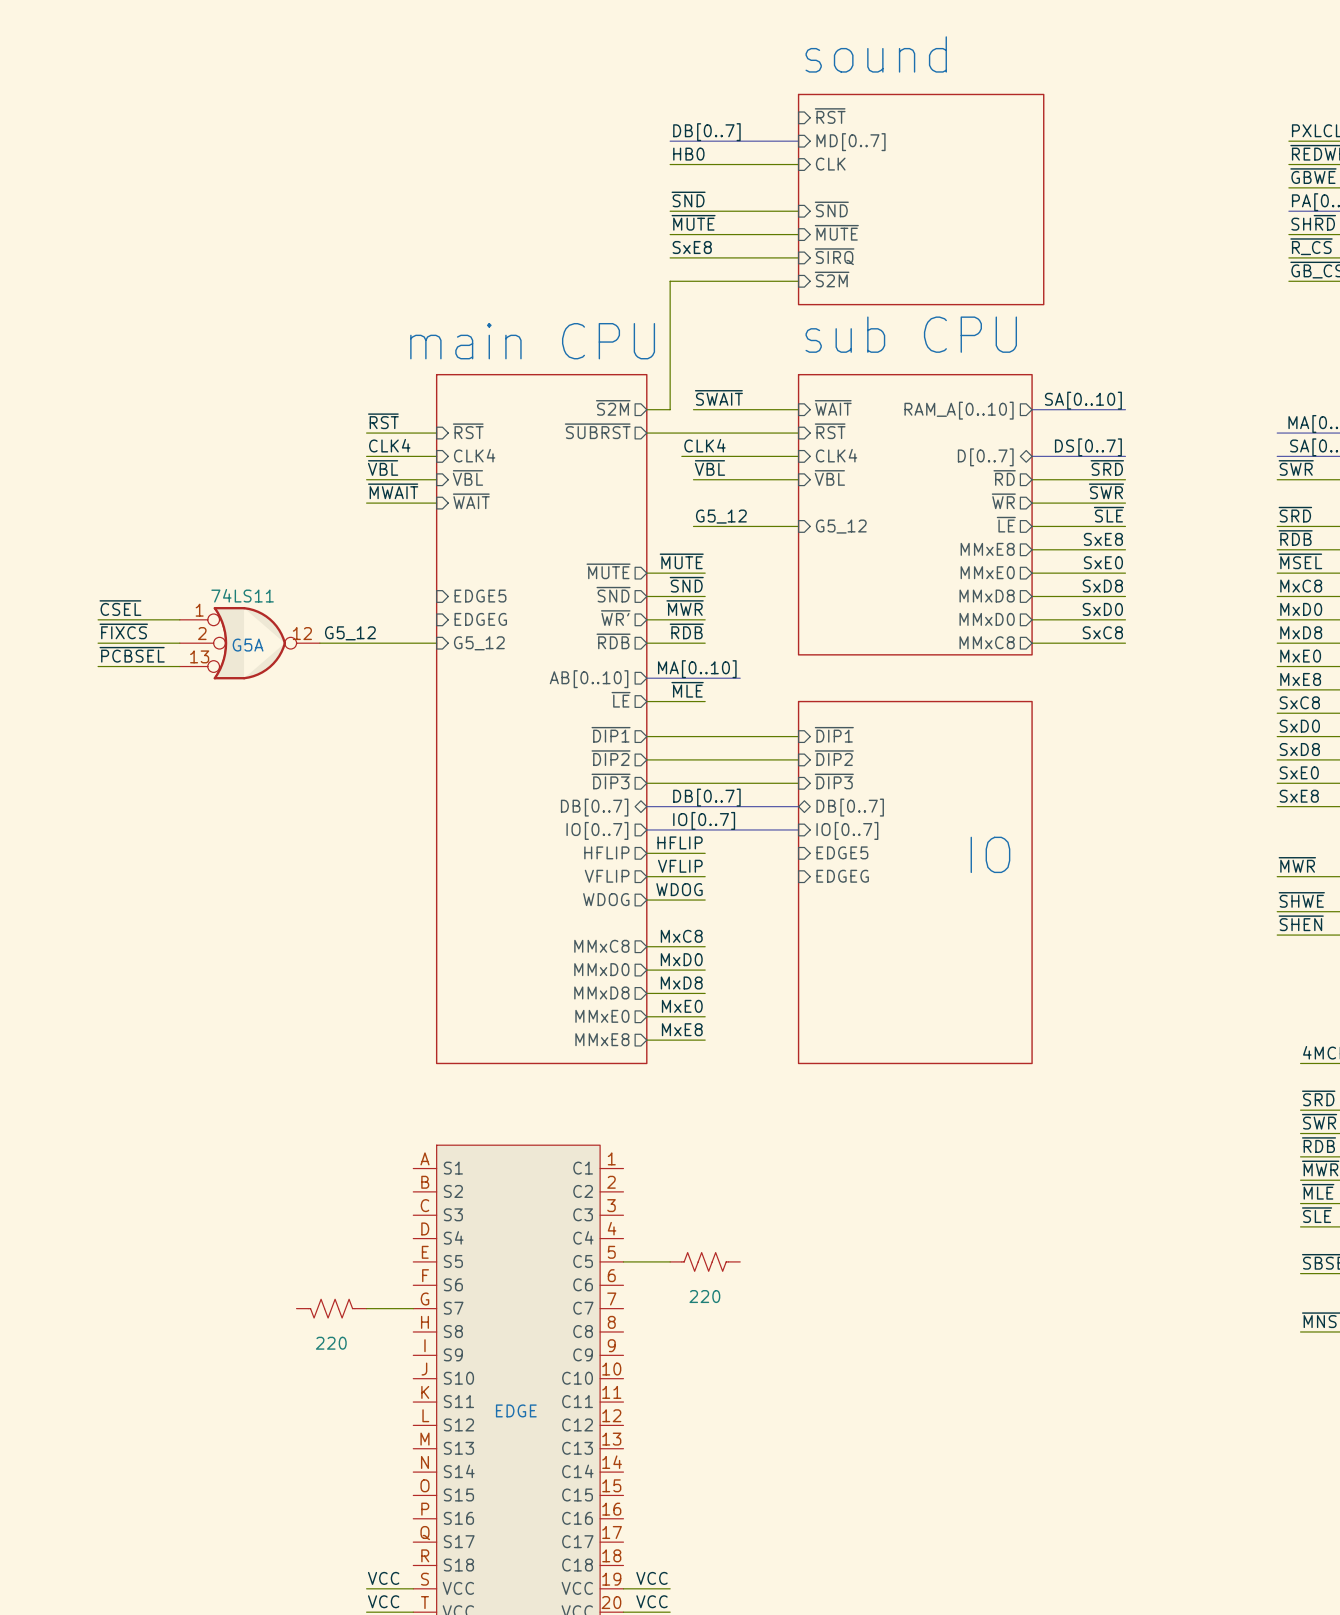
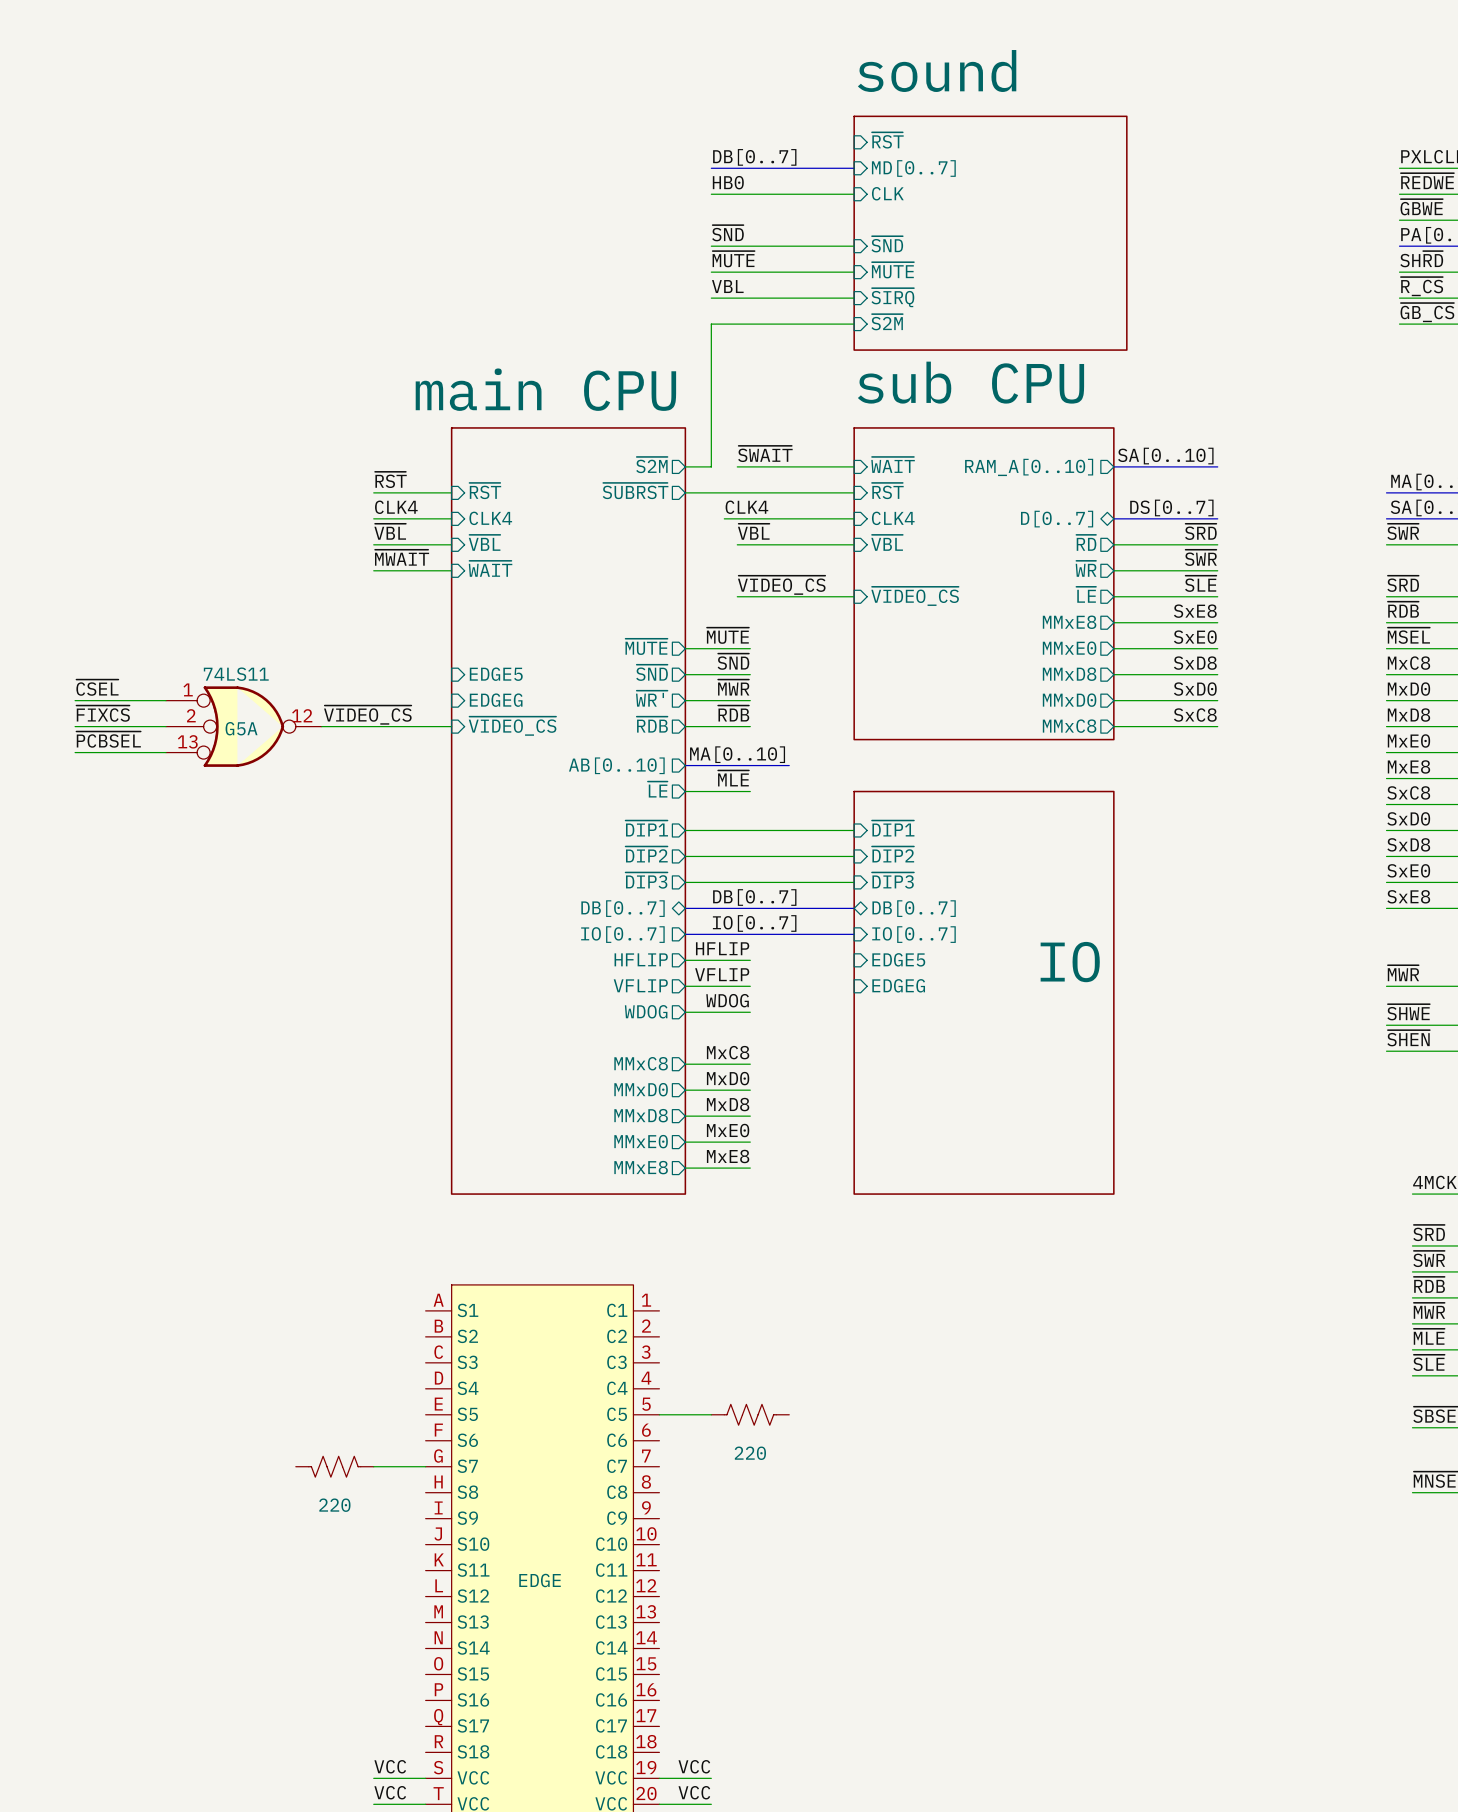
label: SxE8 (692, 247) -> VBL (727, 286)
label: G5_12 (721, 516) -> ~{VIDEO_CS} (781, 585)
sheet pin: G5_12 (841, 526) -> ~{VIDEO_CS} (915, 596)
label: none -> ~{VIDEO_CS} (367, 715)
label: G5_12 (350, 633) -> none
sheet pin: G5_12 (479, 643) -> ~{VIDEO_CS} (512, 726)

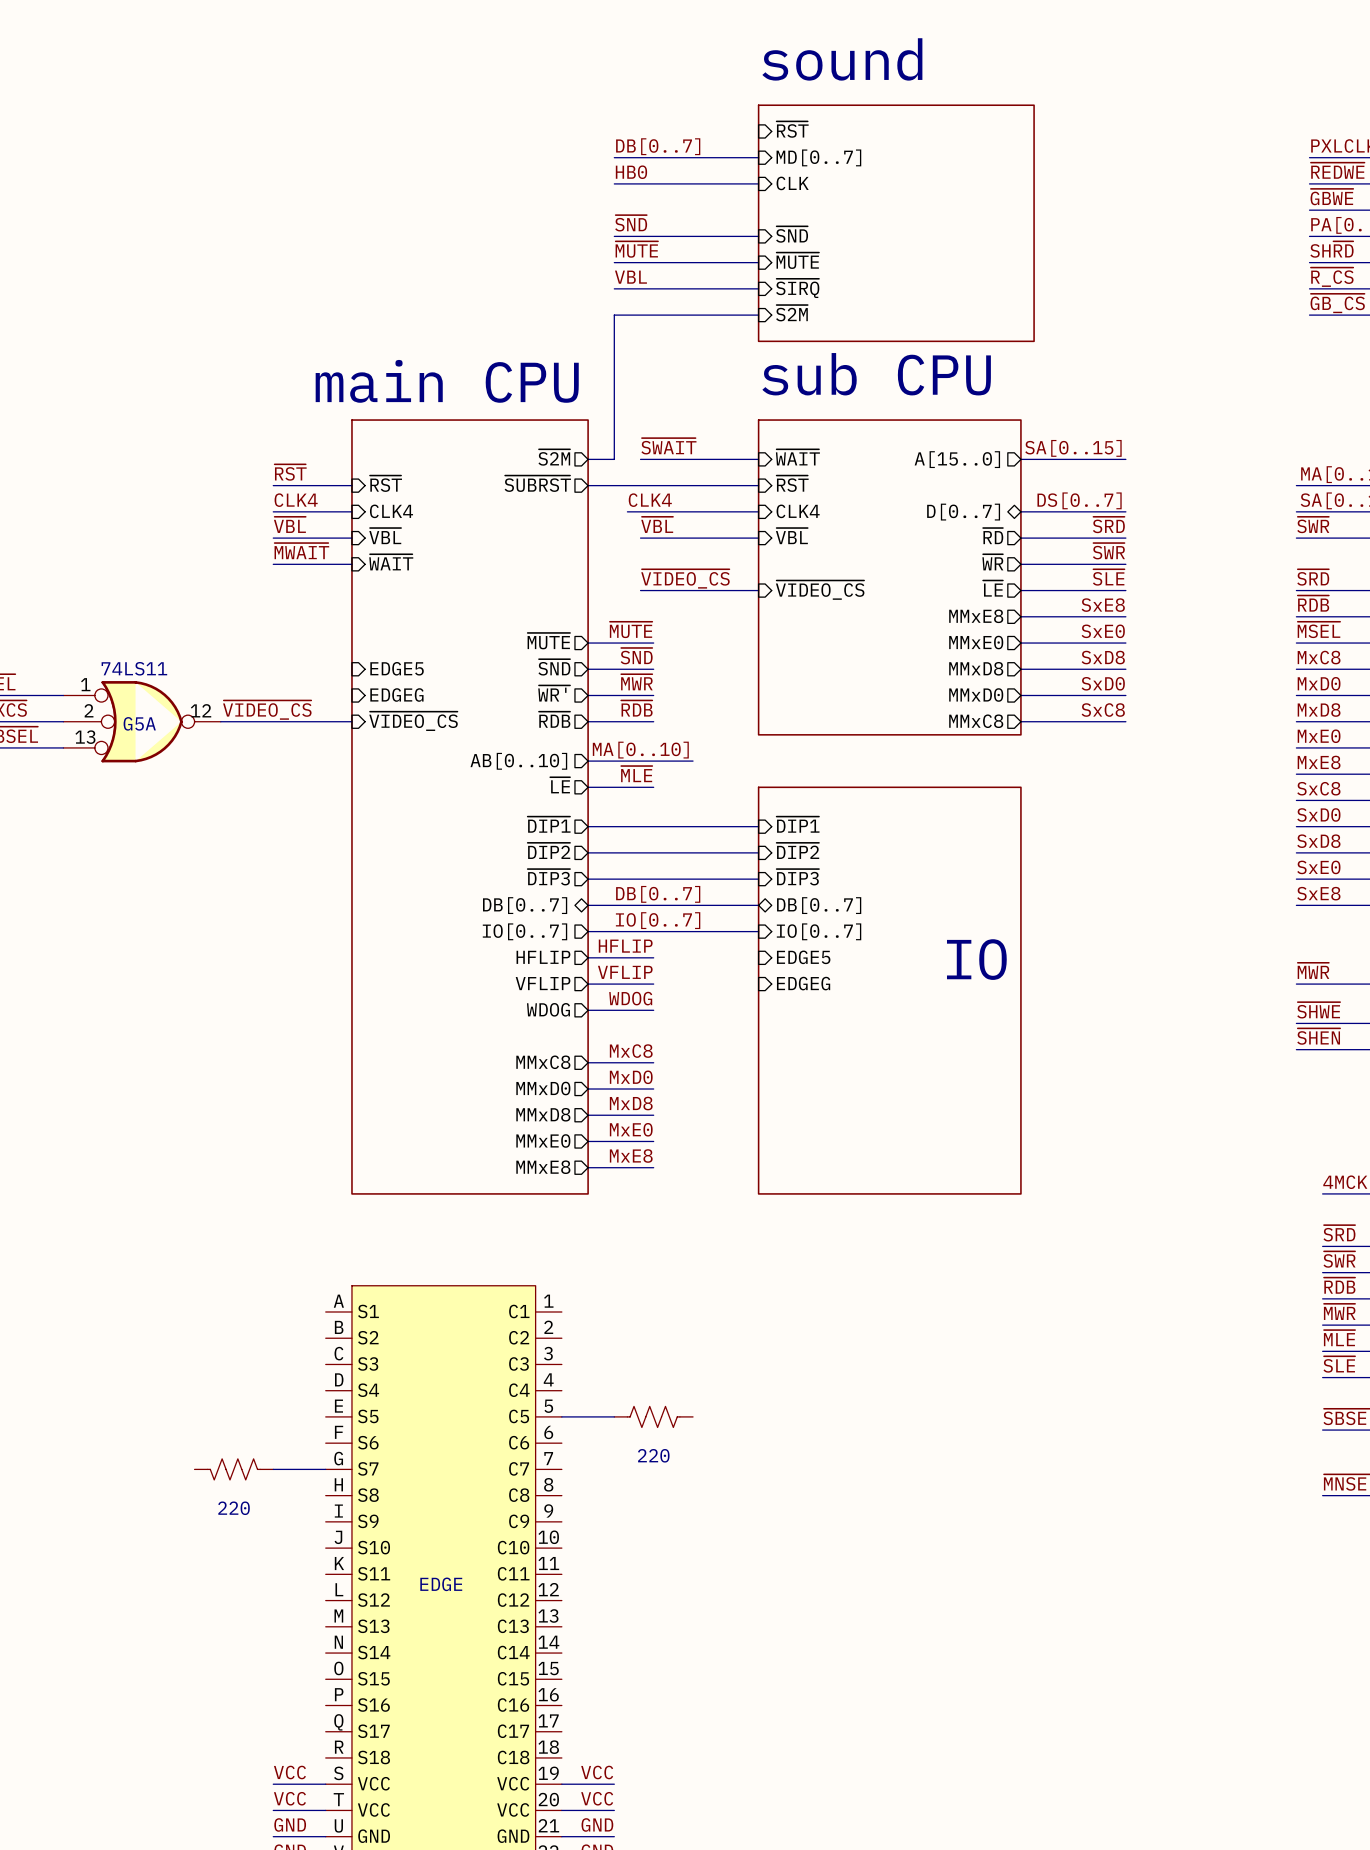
label: SA[0..10] (1165, 456) -> SA[0..15] (1073, 448)
sheet pin: RAM_A[0..10] (1029, 467) -> A[15..0] (957, 459)

